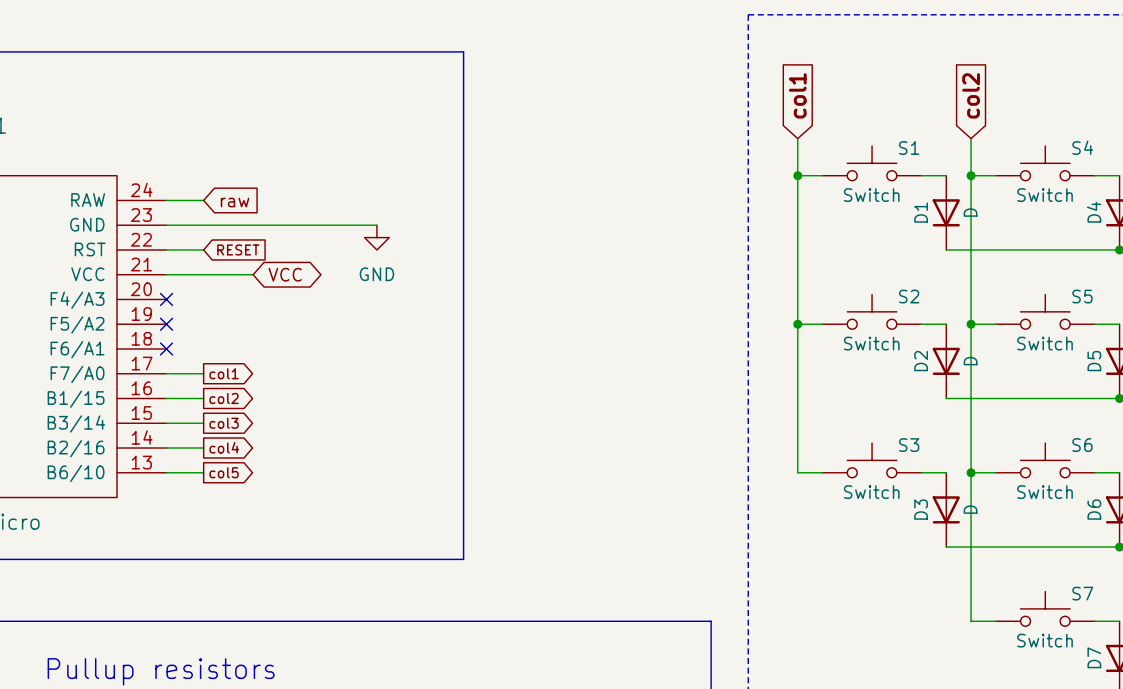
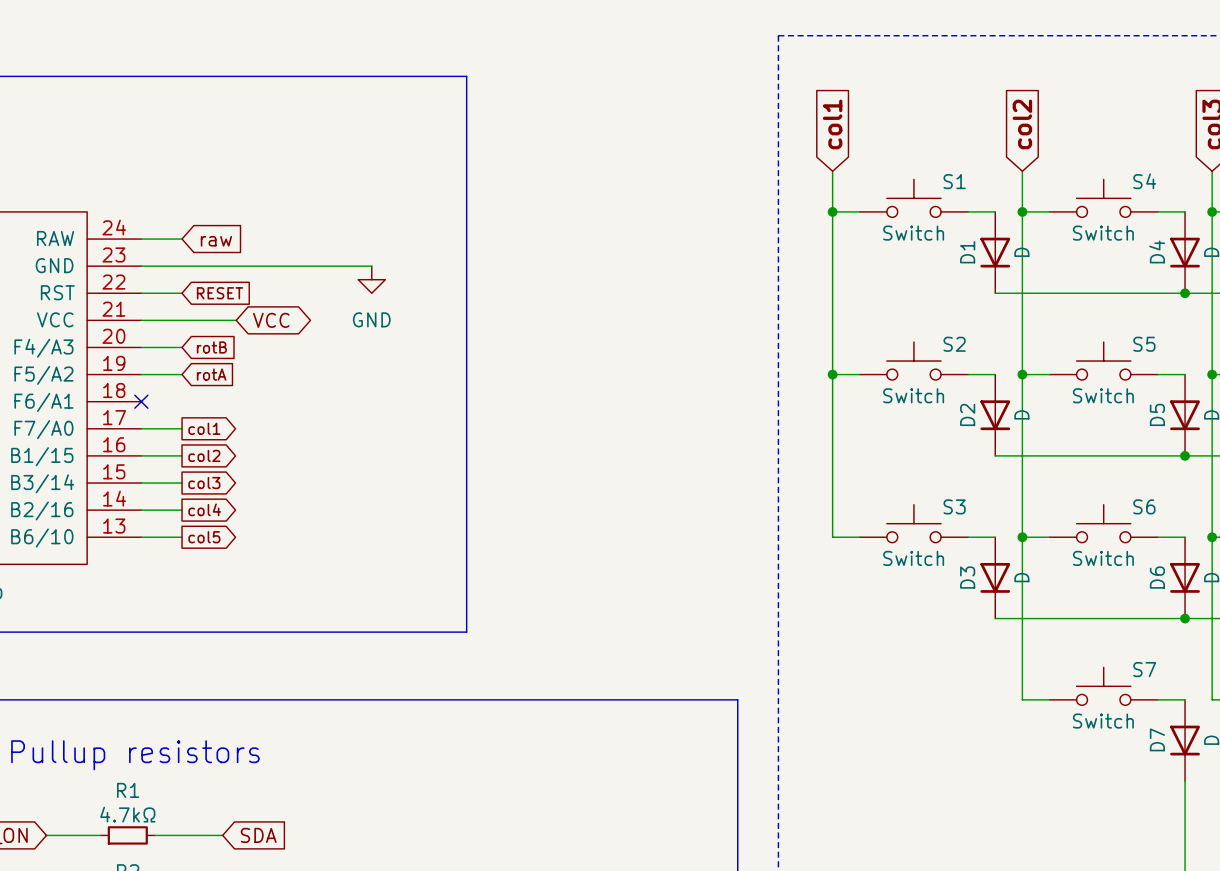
wire: none -> (141, 347) (182, 347)
no-connect mark: (166, 299) -> none
global label: none -> rotB (211, 347)
wire: none -> (141, 374) (182, 374)
no-connect mark: (166, 324) -> none
global label: none -> rotA (211, 374)

